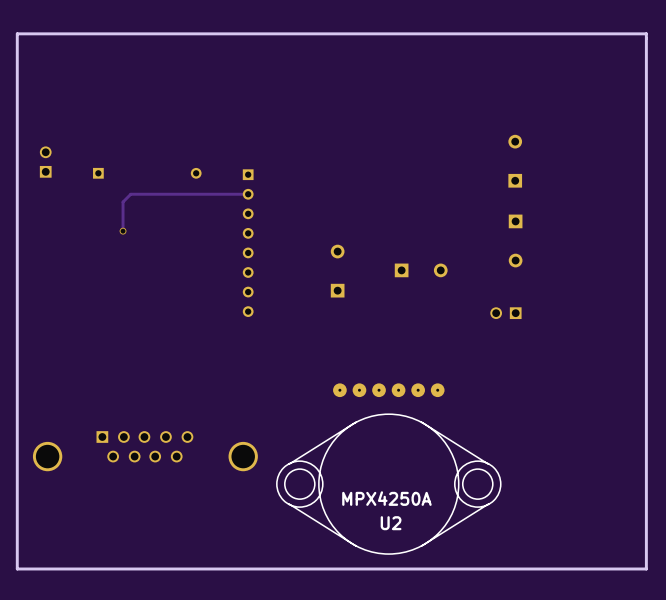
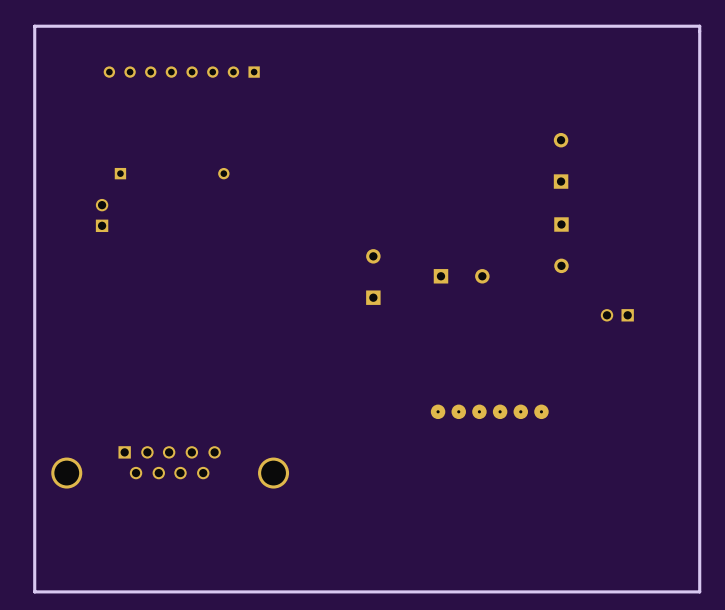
part position: (45, 162) -> (102, 215)
track: (248, 194) (130, 194) (123, 202) (123, 231) -> none
via: (123, 231) -> none
part rotation: 0° (248, 243) -> 90° clockwise (181, 72)
part position: (248, 243) -> (181, 72)
part position: (505, 313) -> (617, 315)
U2 side: bottom (388, 469) -> top (489, 411)

